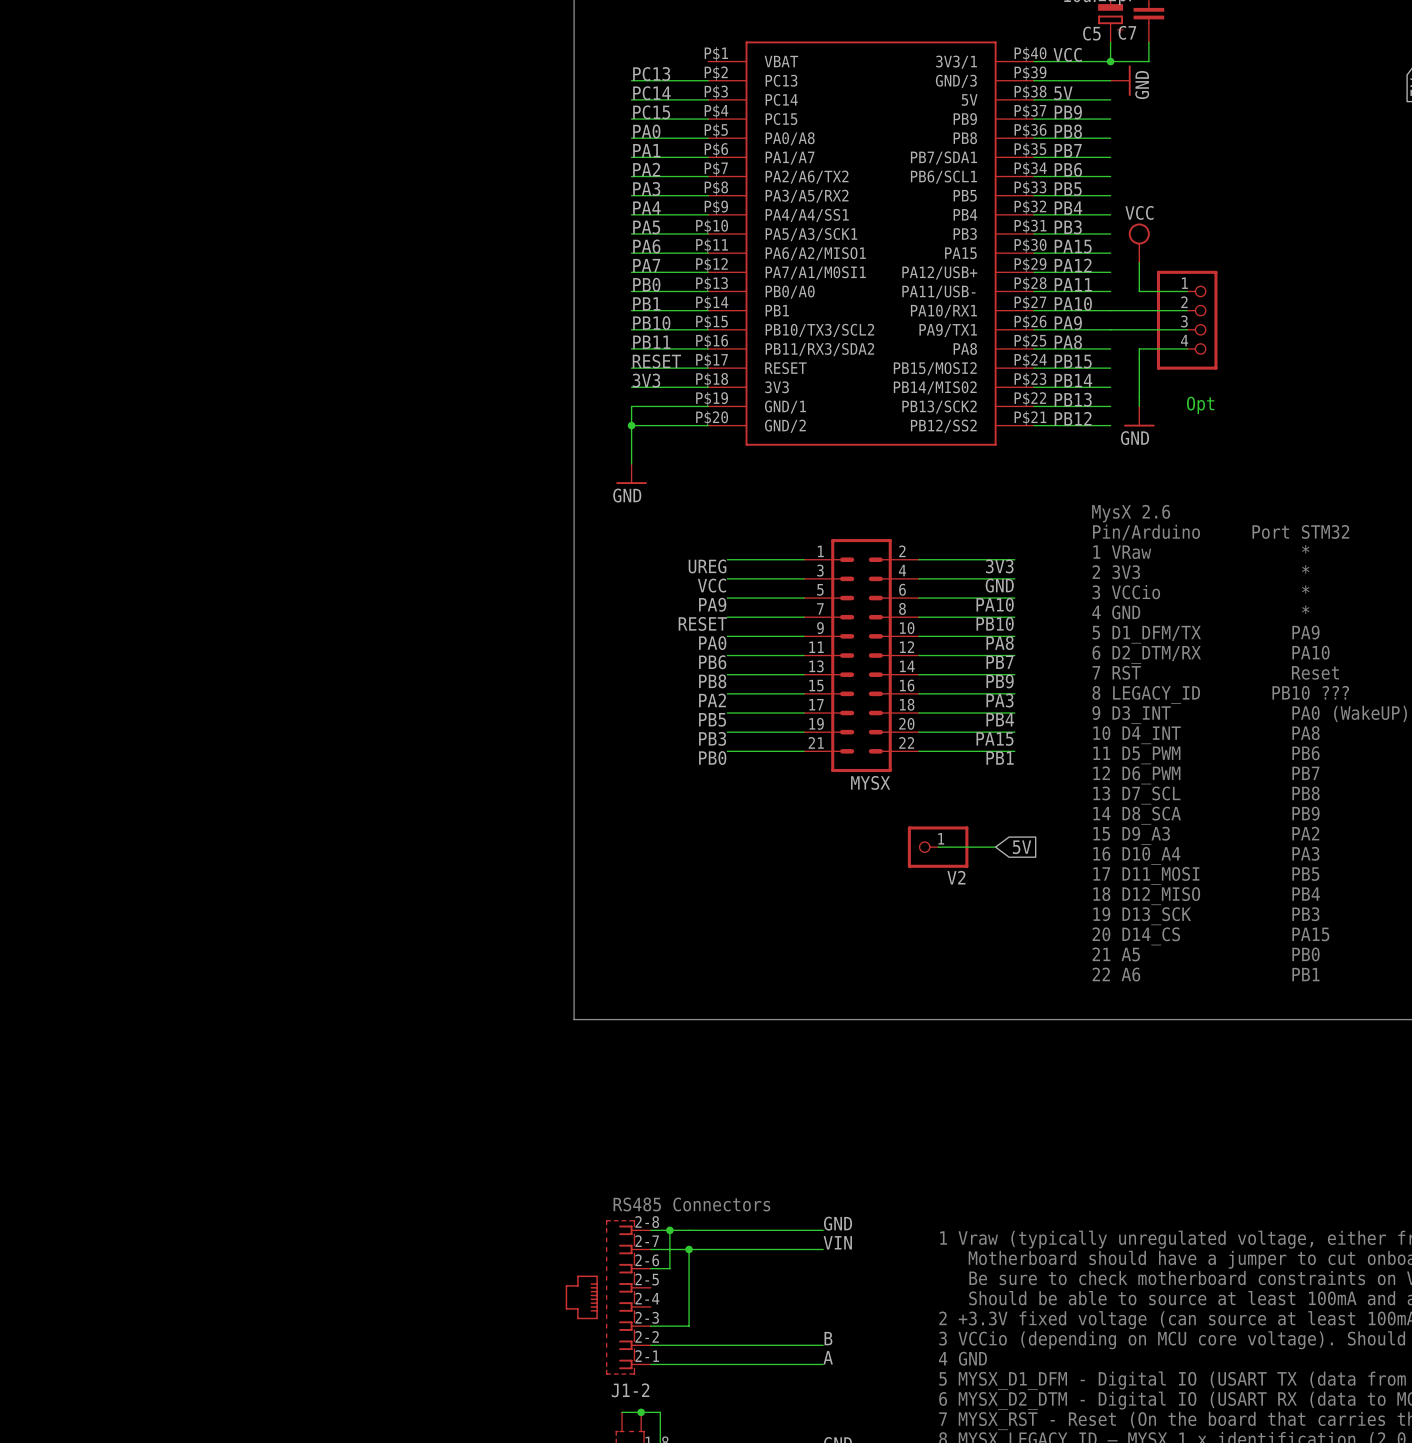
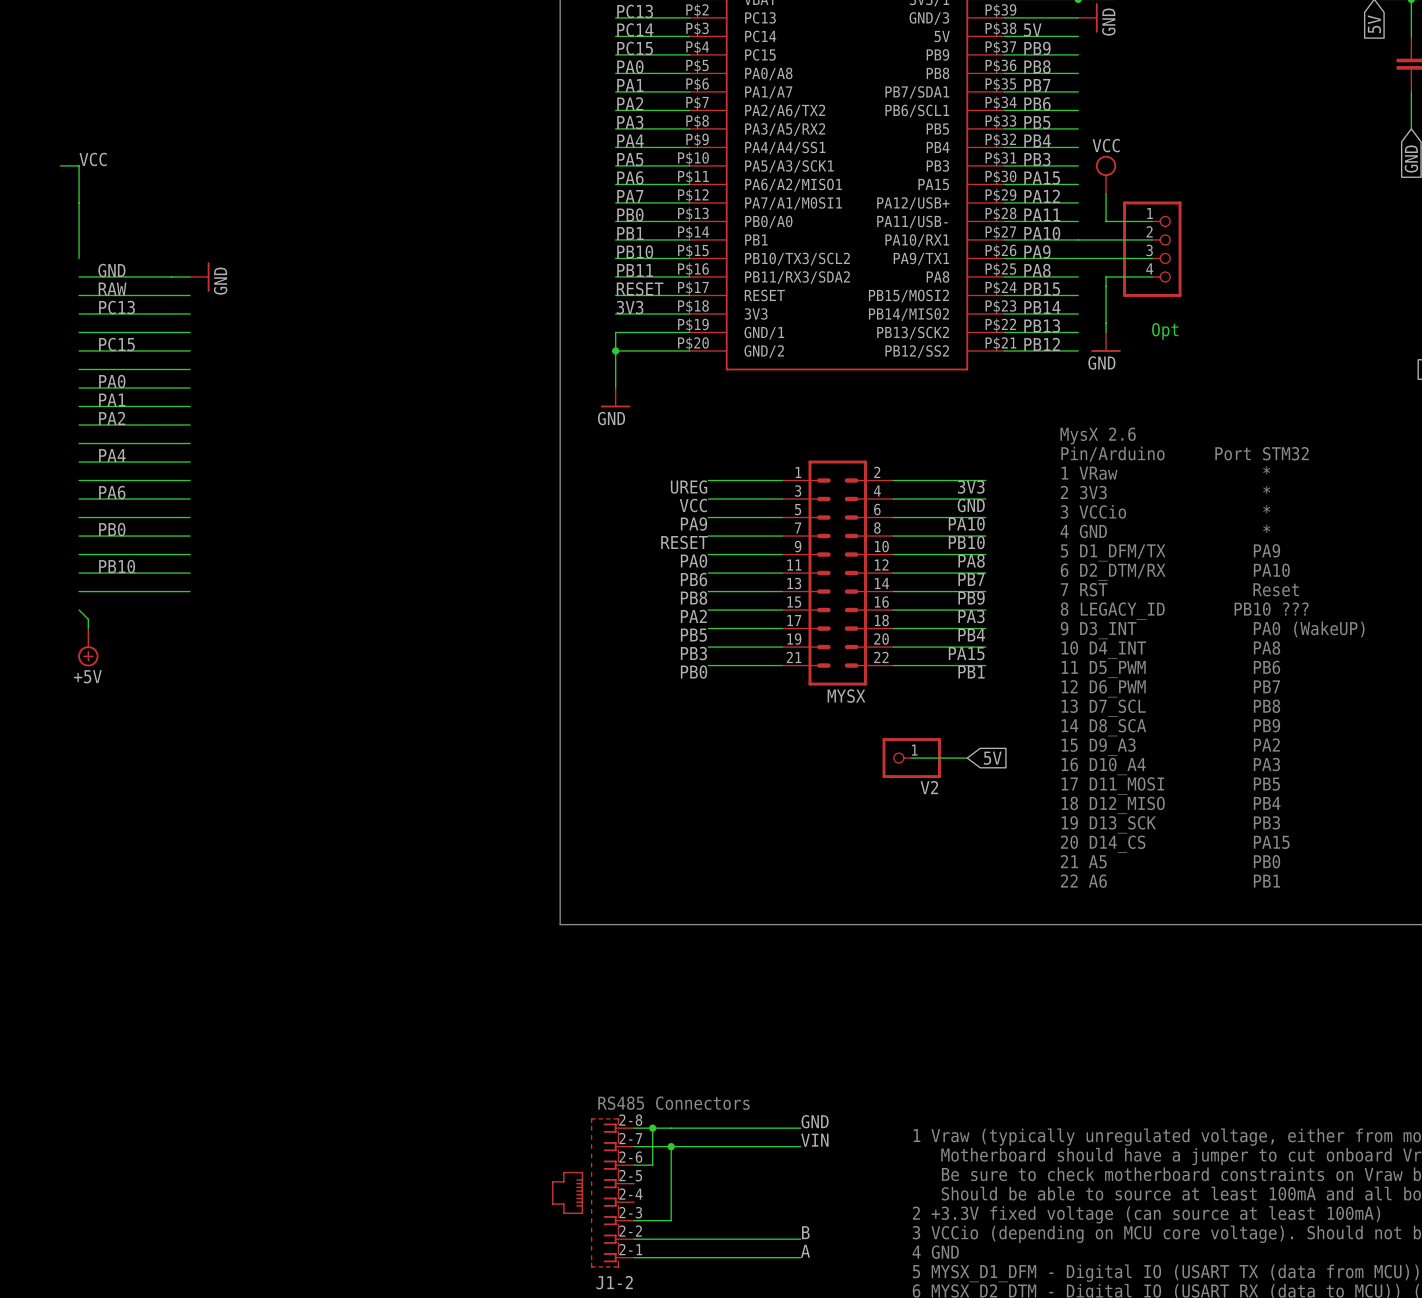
label: none -> VCC (93, 159)
wire: none -> (60, 165) (79, 165) (79, 258)
label: none -> GND (111, 270)
wire: none -> (79, 276) (190, 276)
power symbol: none -> GND (199, 276)
label: none -> RAW (112, 289)
wire: none -> (79, 295) (190, 295)
label: none -> PC13 (116, 307)
wire: none -> (79, 313) (190, 313)
wire: none -> (79, 332) (190, 332)
label: none -> PC15 (116, 344)
wire: none -> (79, 350) (190, 350)
wire: none -> (79, 369) (190, 369)
label: none -> PA0 (112, 381)
wire: none -> (79, 387) (190, 387)
label: none -> PA1 (112, 400)
wire: none -> (79, 406) (190, 406)
label: none -> PA2 (112, 418)
wire: none -> (79, 425) (190, 425)
wire: none -> (79, 443) (190, 443)
label: none -> PA4 (112, 455)
wire: none -> (79, 462) (190, 462)
wire: none -> (79, 480) (190, 480)
label: none -> PA6 (112, 492)
wire: none -> (79, 499) (190, 499)
wire: none -> (79, 517) (190, 517)
label: none -> PB0 (112, 529)
wire: none -> (79, 536) (190, 536)
wire: none -> (79, 554) (190, 554)
label: none -> PB10 (117, 566)
wire: none -> (79, 573) (190, 573)
wire: none -> (79, 591) (190, 591)
wire: none -> (79, 610) (88, 619) (88, 628)
power symbol: none -> +5V (88, 647)

